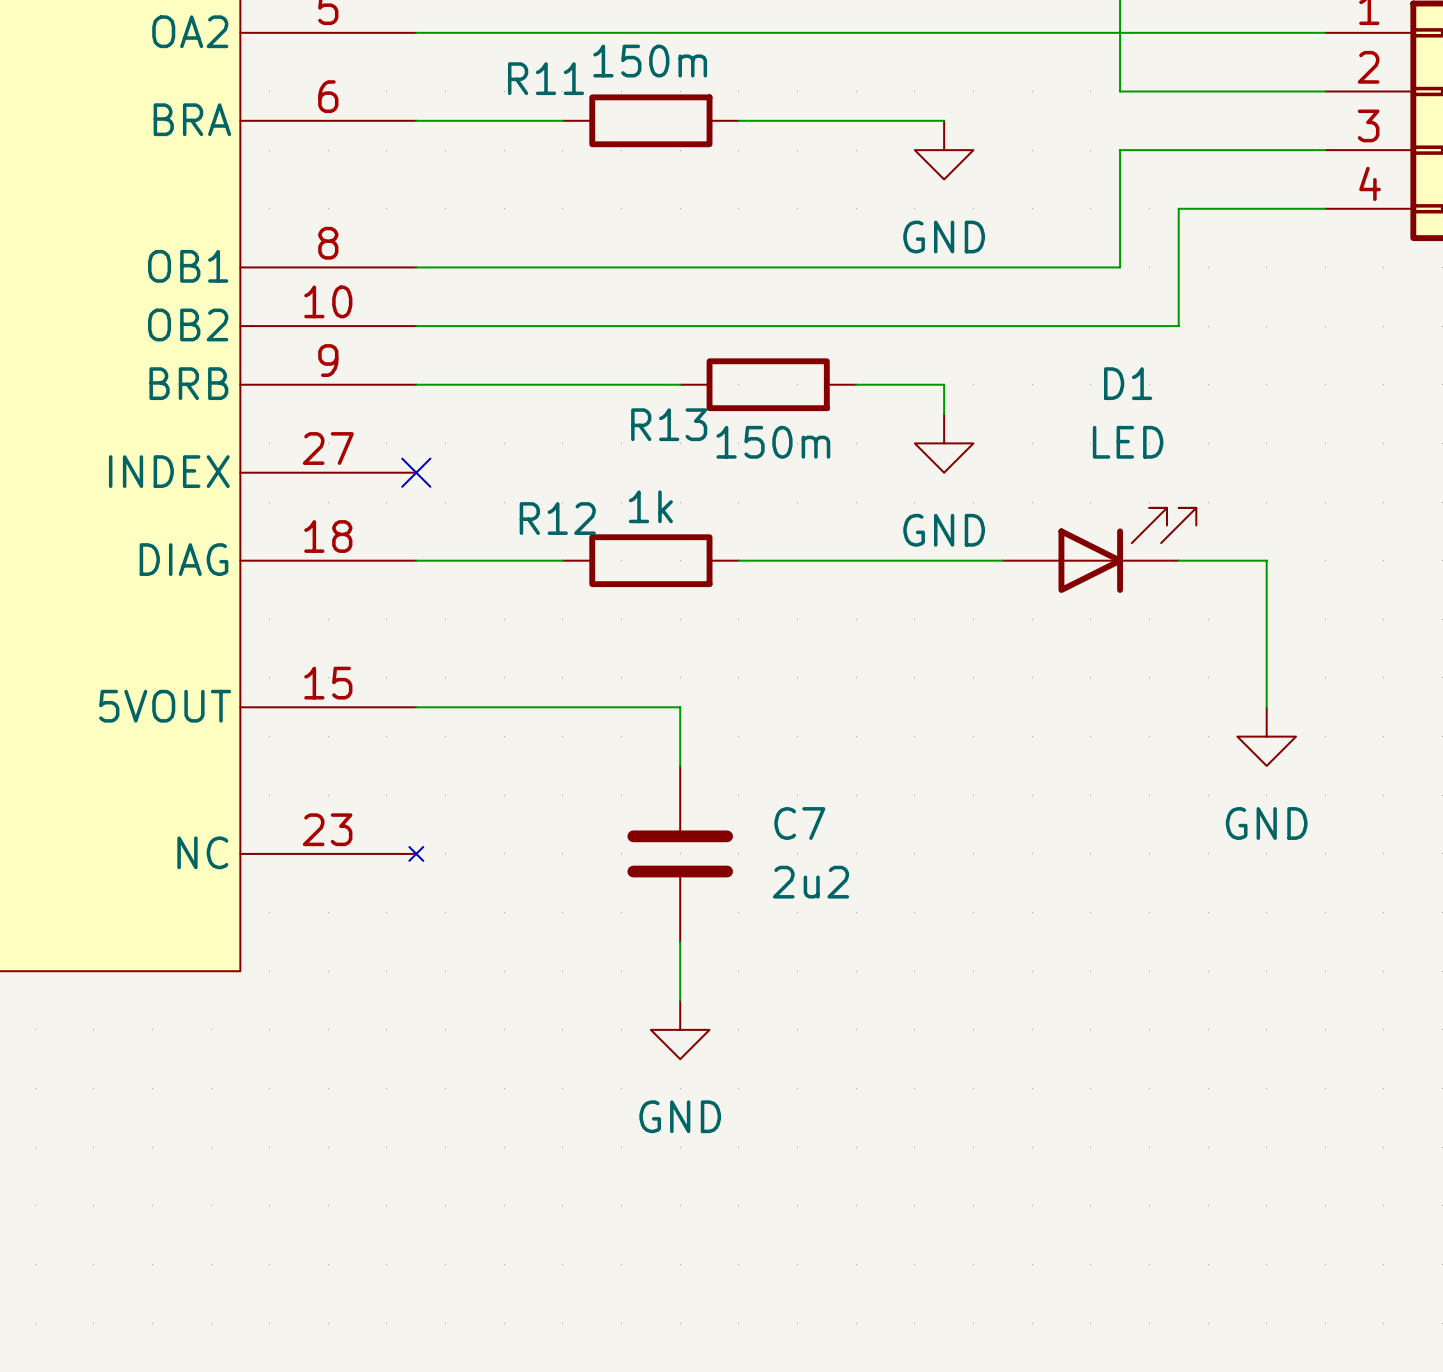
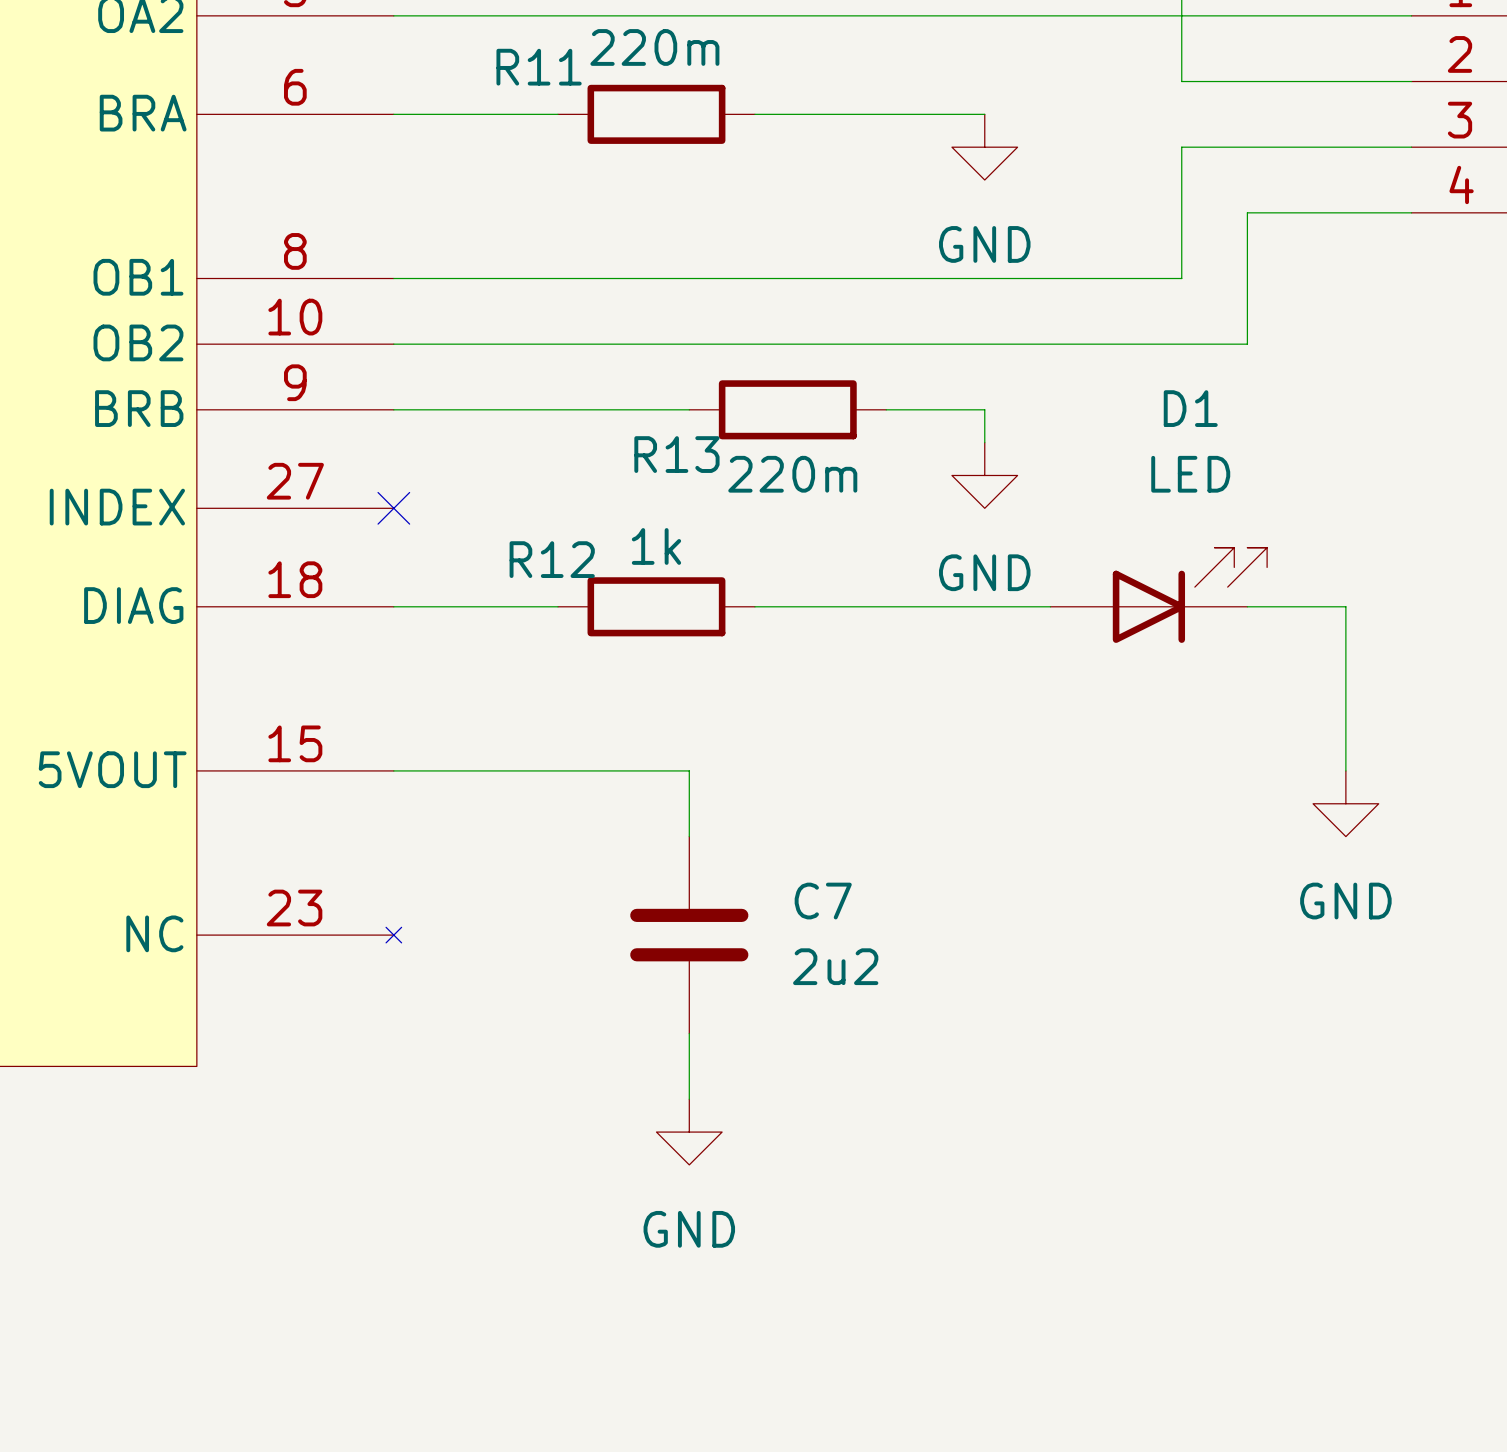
R11 value: 150m (650, 61) -> 220m (654, 47)
R13 value: 150m (773, 442) -> 220m (792, 474)

